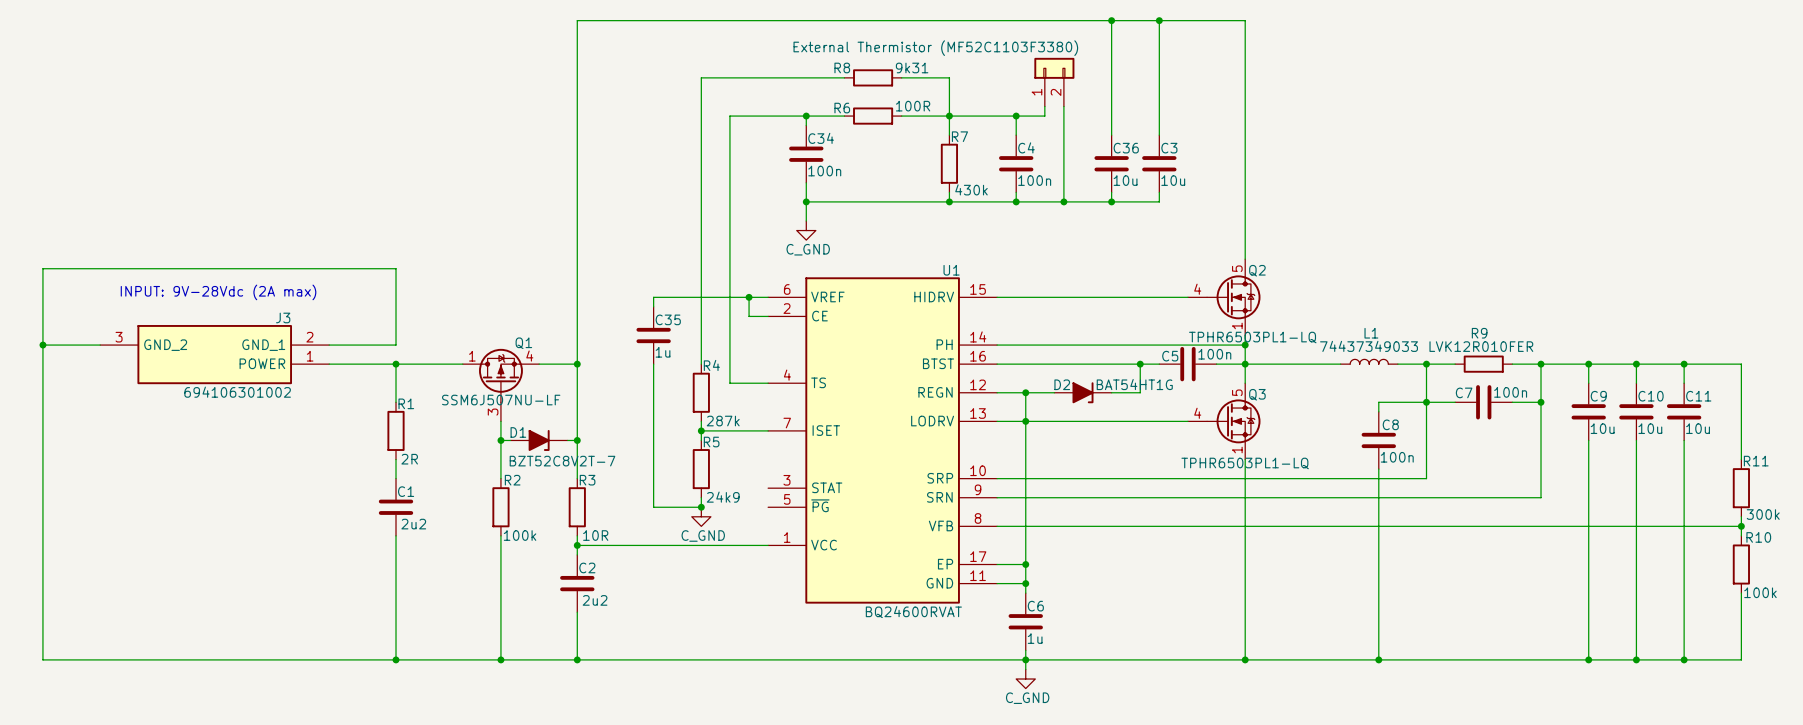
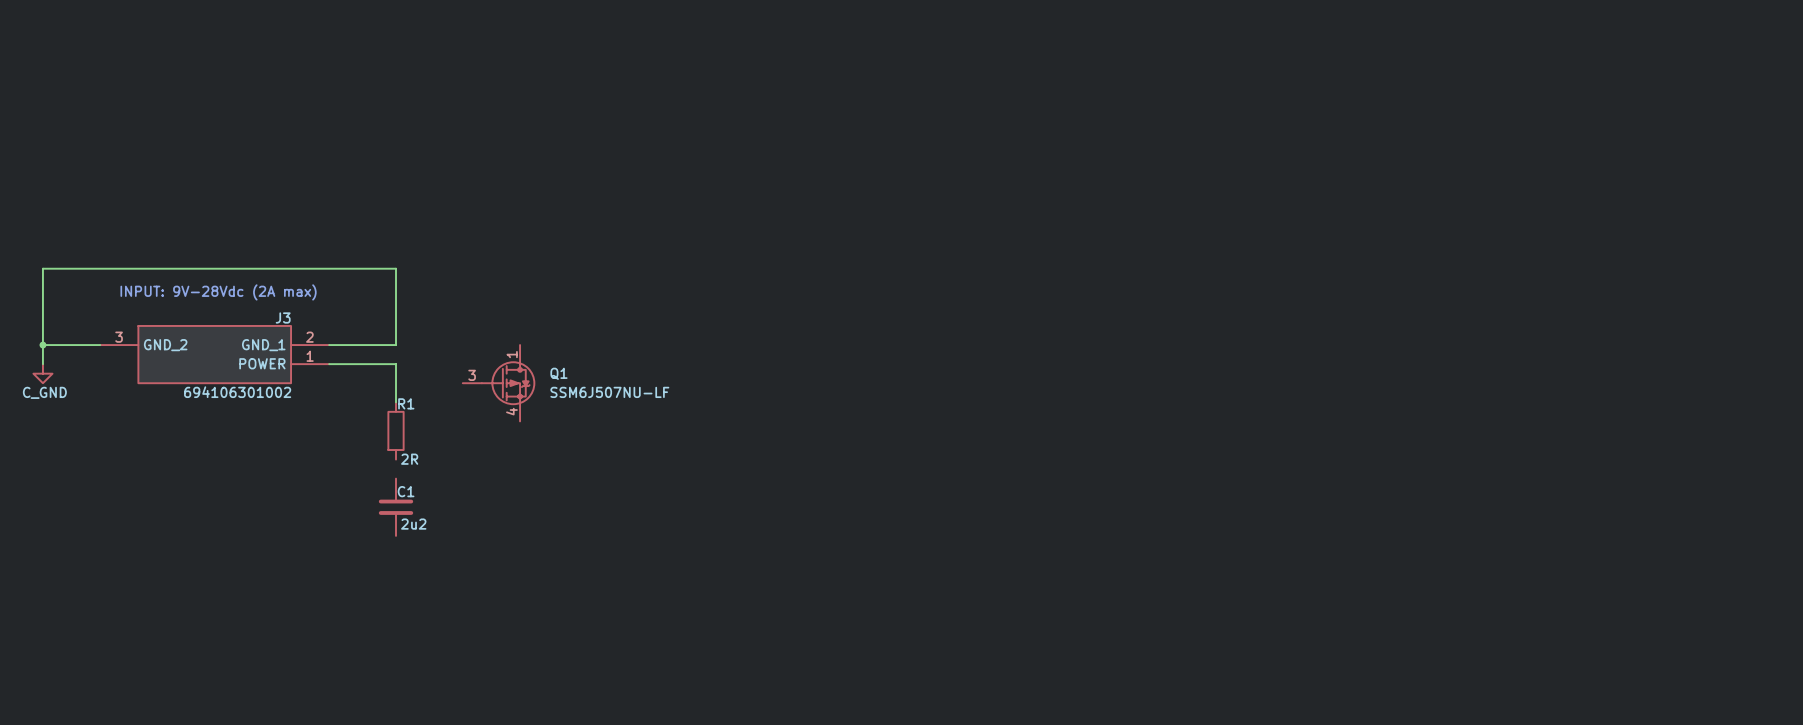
wire: (1111, 20) (1111, 135) -> none
junction: (1111, 20) -> none
wire: (1159, 20) (1159, 135) -> none
junction: (1159, 20) -> none
wire: (844, 77) (701, 77) (701, 364) -> none
R8: 9k31 (873, 77) -> none
wire: (901, 77) (949, 77) (949, 135) -> none
part: External Thermistor (MF52C1103F3380) (1054, 82) -> none
wire: (1044, 106) (1044, 116) (901, 116) -> none
wire: (1063, 106) (1063, 201) -> none
wire: (806, 116) (806, 125) -> none
junction: (806, 116) -> none
wire: (844, 116) (729, 116) (729, 383) (768, 383) -> none
R6: 100R (873, 116) -> none
junction: (949, 116) -> none
wire: (1016, 116) (1016, 135) -> none
junction: (1016, 116) -> none
C34: 100n (806, 154) -> none
R7: 430k (949, 163) -> none
C4: 100n (1016, 163) -> none
C36: 10u (1111, 163) -> none
C3: 10u (1159, 163) -> none
wire: (806, 182) (806, 221) -> none
wire: (949, 192) (949, 201) -> none
wire: (1016, 192) (1016, 201) -> none
wire: (1111, 192) (1111, 201) -> none
wire: (1159, 192) (1159, 201) (806, 201) -> none
junction: (806, 201) -> none
junction: (949, 201) -> none
junction: (1016, 201) -> none
junction: (1063, 201) -> none
junction: (1111, 201) -> none
power symbol: C_GND (806, 230) -> none
wire: (1245, 259) (1245, 20) (577, 20) (577, 478) -> none
wire: (749, 297) (749, 316) (768, 316) -> none
junction: (749, 297) -> none
wire: (768, 297) (653, 297) (653, 306) -> none
wire: (997, 297) (1187, 297) -> none
Q2: TPHR6503PL1-LQ (1224, 297) -> none
C35: 1u (653, 335) -> none
wire: (1245, 335) (1245, 383) -> none
Q1 name position: Q1 (523, 343) -> Q1 (558, 373)
wire: (997, 345) (1245, 345) -> none
junction: (1245, 345) -> none
L1: 74437349033 (1369, 361) -> none
wire: (42, 364) (42, 659) (1741, 659) (1741, 593) -> none
wire: (396, 364) (462, 364) -> none
junction: (396, 364) -> none
wire: (539, 364) (577, 364) -> none
junction: (577, 364) -> none
wire: (653, 364) (653, 507) (701, 507) (701, 497) -> none
wire: (997, 364) (1159, 364) -> none
wire: (1140, 364) (1140, 392) (1111, 392) -> none
junction: (1140, 364) -> none
C5: 100n (1187, 364) -> none
wire: (1216, 364) (1340, 364) -> none
junction: (1245, 364) -> none
wire: (1397, 364) (1455, 364) -> none
wire: (1426, 364) (1426, 478) (997, 478) -> none
junction: (1426, 364) -> none
R9: LVK12R010FER (1483, 364) -> none
wire: (1512, 364) (1741, 364) (1741, 459) -> none
wire: (1541, 364) (1541, 497) (997, 497) -> none
junction: (1541, 364) -> none
wire: (1588, 364) (1588, 383) -> none
junction: (1588, 364) -> none
wire: (1636, 364) (1636, 383) -> none
junction: (1636, 364) -> none
wire: (1684, 364) (1684, 383) -> none
junction: (1684, 364) -> none
power symbol: none -> C_GND (42, 373)
Q1 rotation: 0° (500, 375) -> 90° clockwise (508, 383)
R4: 287k (701, 392) -> none
wire: (997, 392) (1054, 392) -> none
wire: (1025, 392) (1025, 593) -> none
junction: (1025, 392) -> none
D2: BAT54HT1G (1083, 392) -> none
Q1 value position: SSM6J507NU-LF (501, 400) -> SSM6J507NU-LF (609, 392)
junction: (1426, 402) -> none
wire: (1455, 402) (1378, 402) (1378, 411) -> none
C7: 100n (1483, 402) -> none
wire: (1512, 402) (1541, 402) -> none
junction: (1541, 402) -> none
C9: 10u (1588, 411) -> none
C10: 10u (1636, 411) -> none
C11: 10u (1684, 411) -> none
wire: (500, 421) (500, 478) -> none
wire: (701, 421) (701, 440) -> none
wire: (997, 421) (1187, 421) -> none
junction: (1025, 421) -> none
Q3: TPHR6503PL1-LQ (1224, 421) -> none
wire: (701, 430) (768, 430) -> none
junction: (701, 430) -> none
wire: (500, 440) (510, 440) -> none
junction: (500, 440) -> none
D1: BZT52C8V2T-7 (539, 440) -> none
wire: (567, 440) (577, 440) -> none
junction: (577, 440) -> none
U1: BQ24600RVAT (882, 440) -> none
C8: 100n (1378, 440) -> none
wire: (1588, 440) (1588, 659) -> none
wire: (1636, 440) (1636, 659) -> none
wire: (1684, 440) (1684, 659) -> none
wire: (396, 459) (396, 478) -> none
wire: (1245, 459) (1245, 659) -> none
R5: 24k9 (701, 469) -> none
wire: (1378, 469) (1378, 659) -> none
R11: 300k (1741, 488) -> none
R2: 100k (500, 507) -> none
R3: 10R (577, 507) -> none
junction: (701, 507) -> none
power symbol: C_GND (701, 516) -> none
wire: (1741, 516) (1741, 535) -> none
wire: (997, 526) (1741, 526) -> none
junction: (1741, 526) -> none
wire: (396, 535) (396, 659) -> none
wire: (500, 535) (500, 659) -> none
wire: (577, 535) (577, 554) -> none
wire: (577, 545) (768, 545) -> none
junction: (577, 545) -> none
wire: (997, 564) (1025, 564) -> none
junction: (1025, 564) -> none
R10: 100k (1741, 564) -> none
C2: 2u2 (577, 583) -> none
wire: (997, 583) (1025, 583) -> none
junction: (1025, 583) -> none
wire: (577, 612) (577, 659) -> none
C6: 1u (1025, 621) -> none
wire: (1025, 650) (1025, 669) -> none
junction: (396, 659) -> none
junction: (500, 659) -> none
junction: (577, 659) -> none
junction: (1025, 659) -> none
junction: (1245, 659) -> none
junction: (1378, 659) -> none
junction: (1588, 659) -> none
junction: (1636, 659) -> none
junction: (1684, 659) -> none
power symbol: C_GND (1025, 679) -> none

